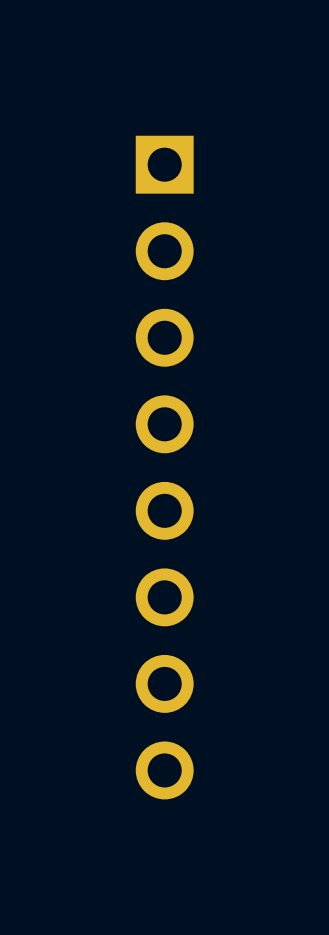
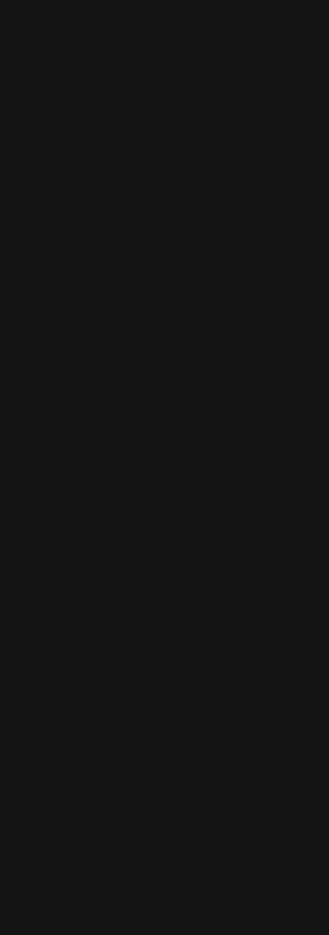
part: (164, 467) -> none

